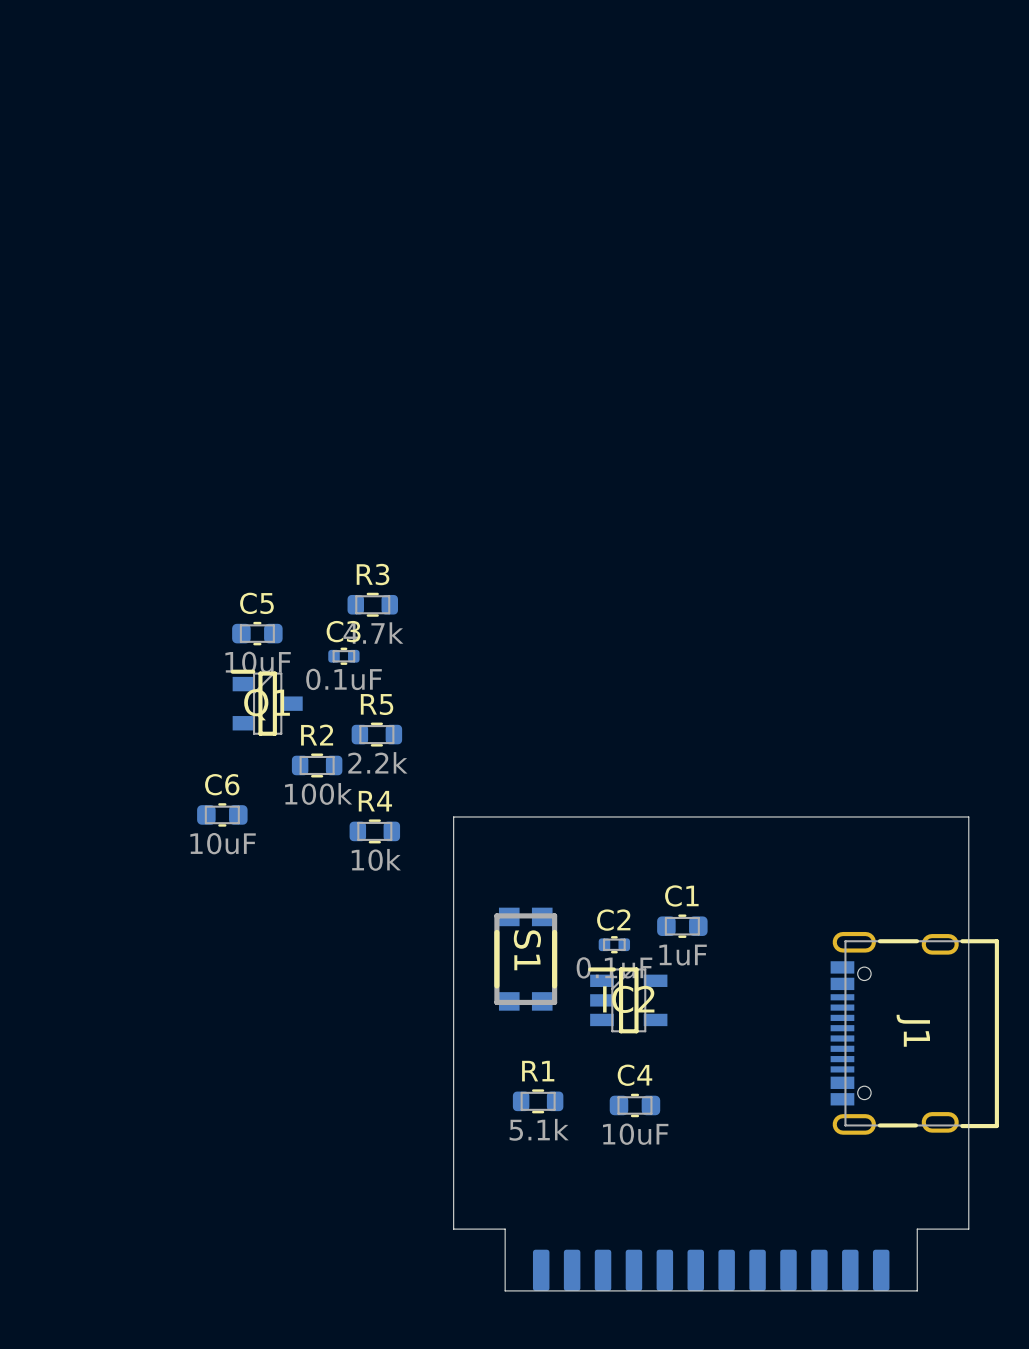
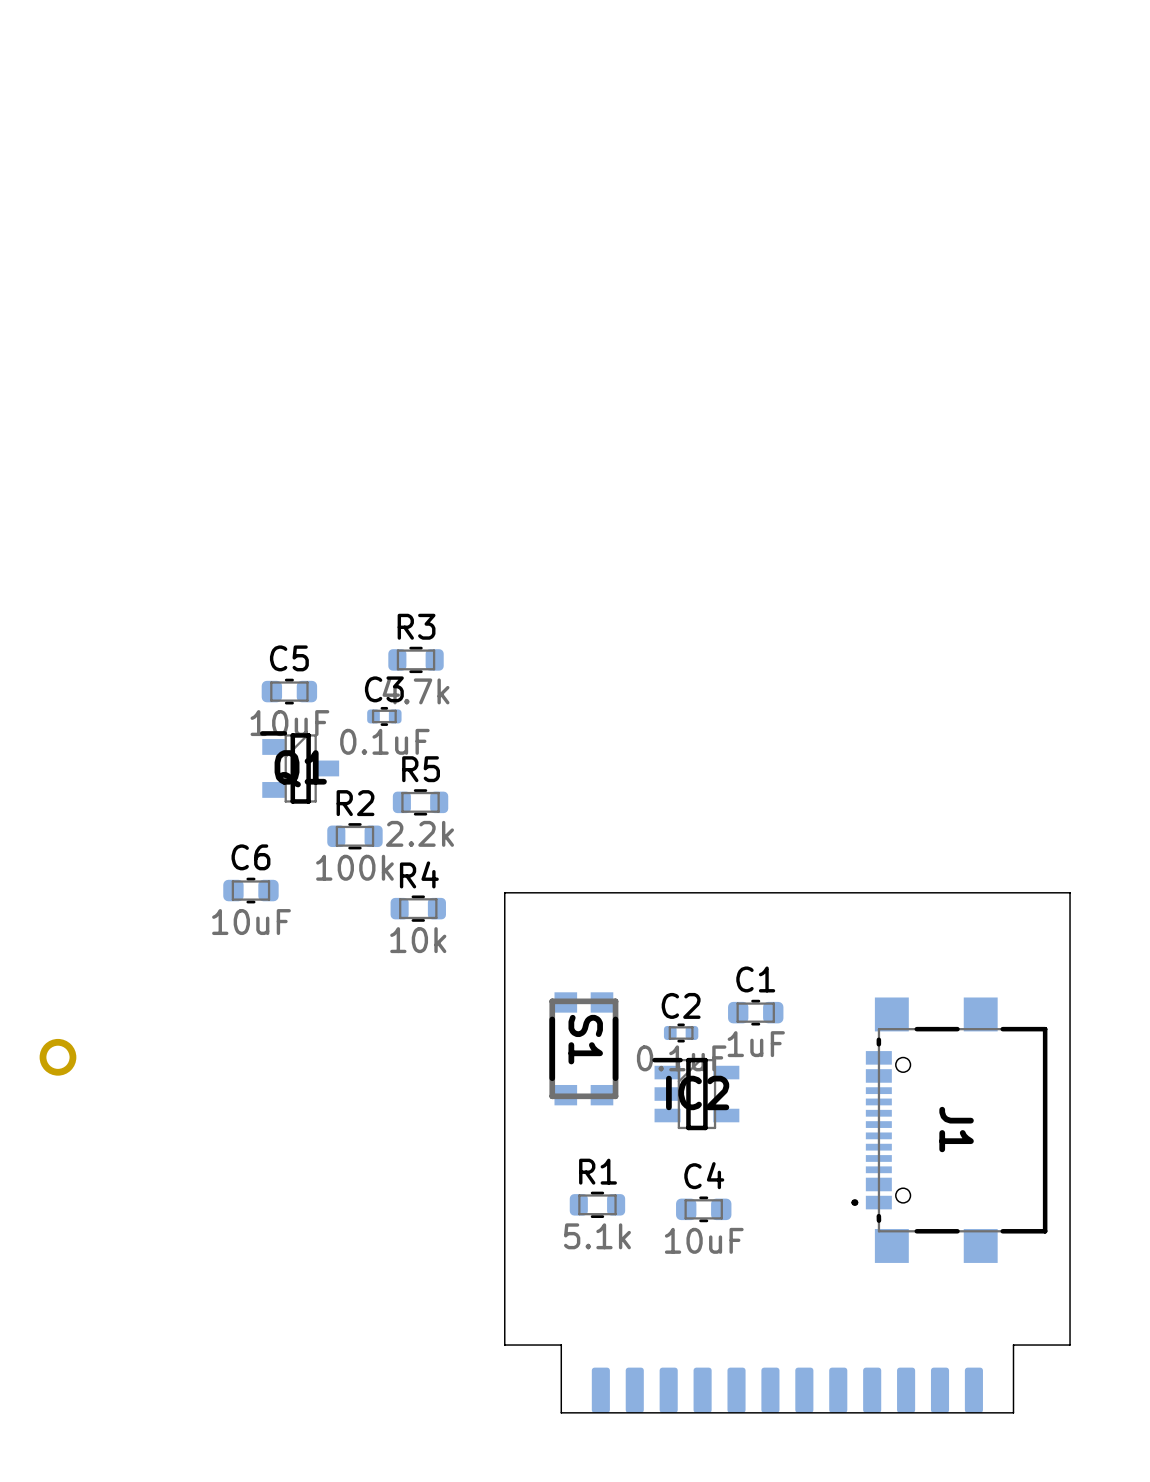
J1 footprint: [830, 931, 999, 1135] -> [851, 997, 1048, 1263]
part: none -> (57, 1057)

